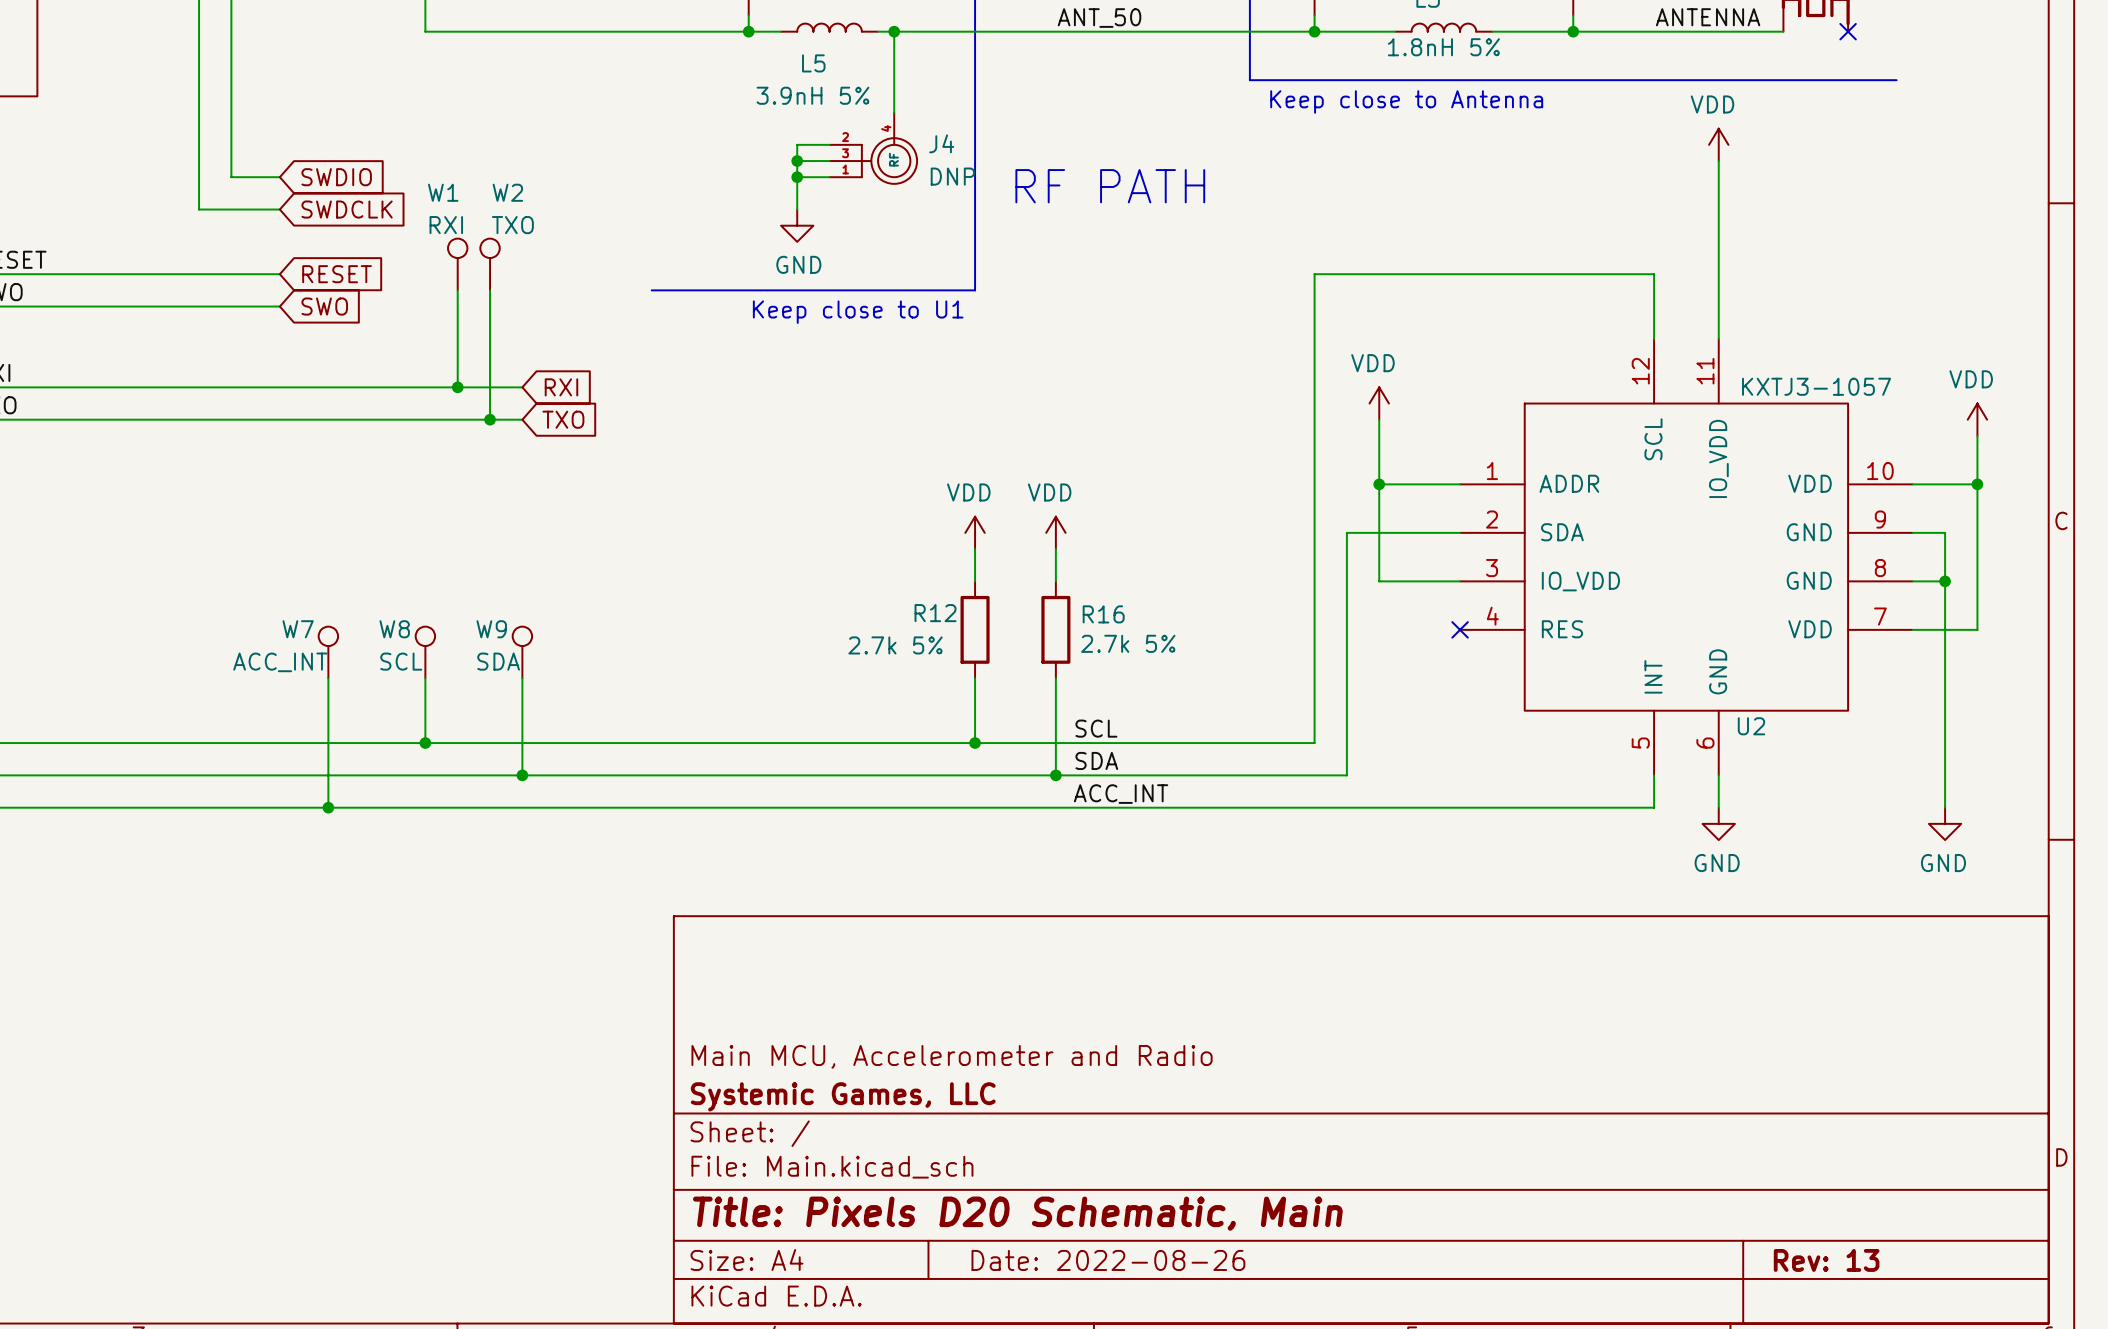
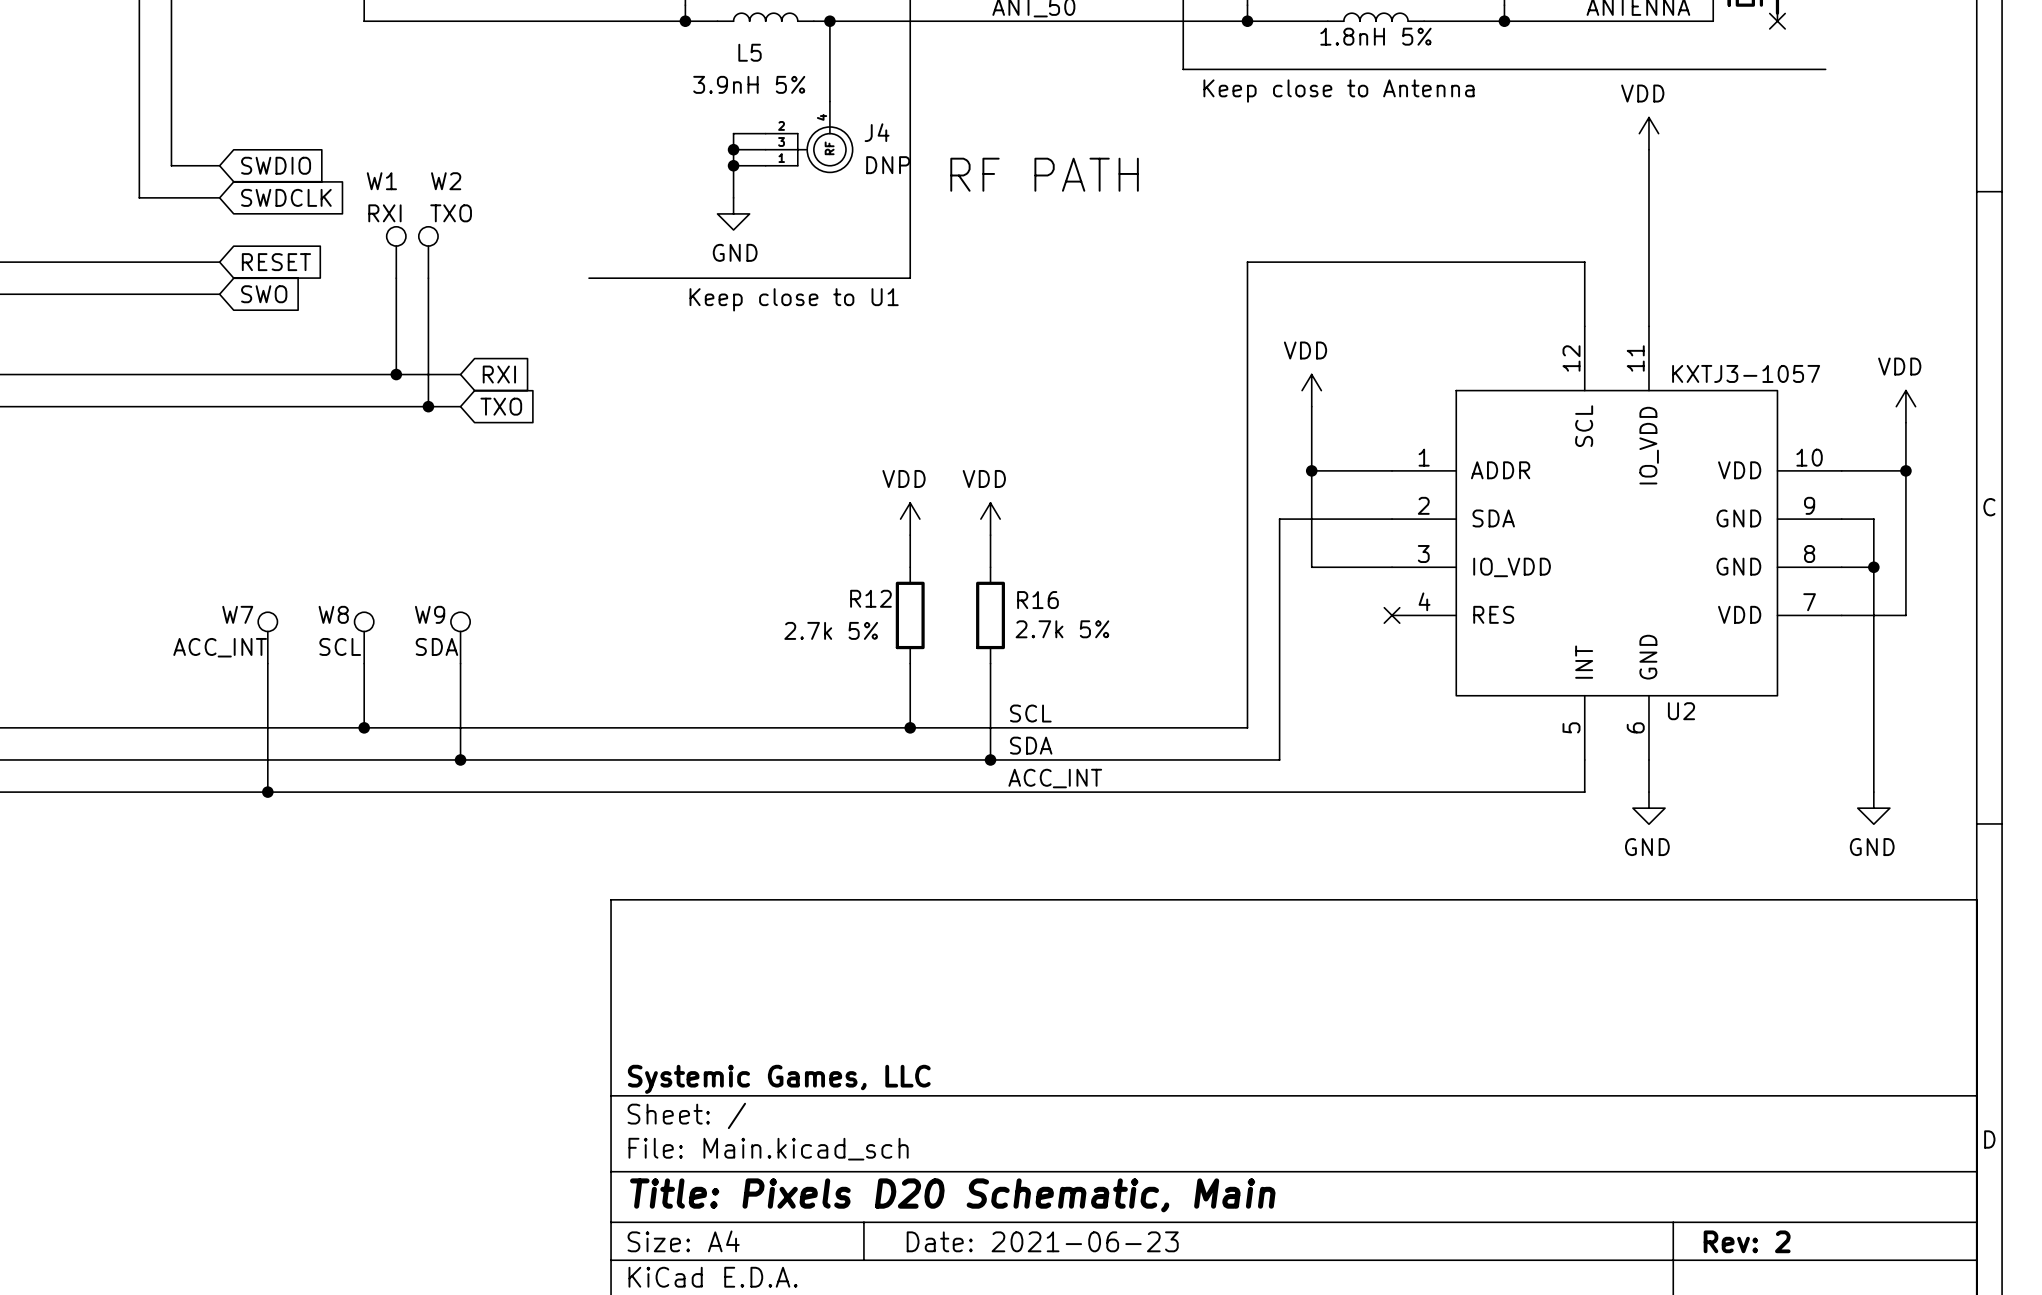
title block: Main MCU, Accelerometer and Radio (952, 1056) -> none
title block: Date: 2022-08-26 (1108, 1260) -> Date: 2021-06-23 (1042, 1241)
title block: Rev: 13 (1826, 1260) -> Rev: 2 (1747, 1241)

